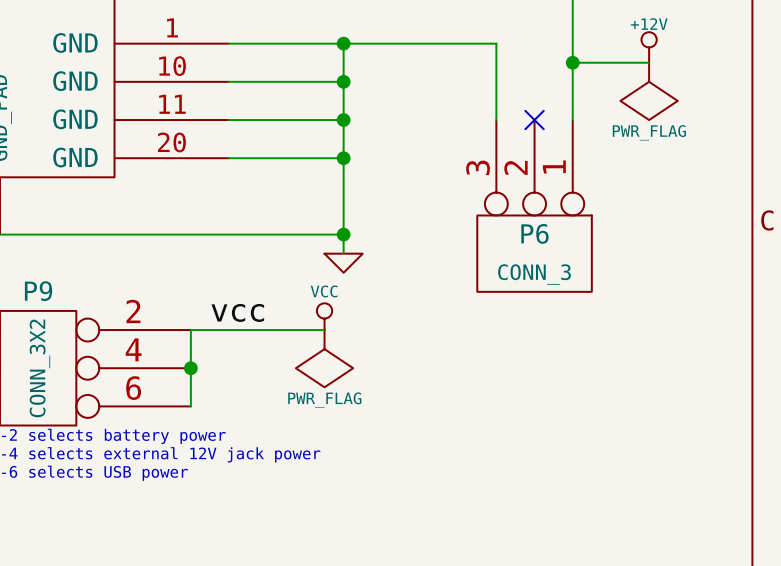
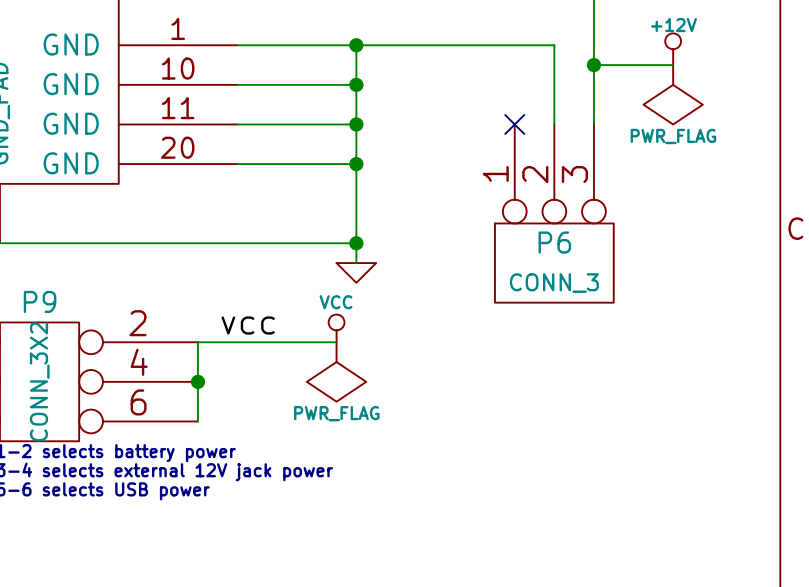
wire: (496, 43) (496, 120) -> (514, 45) (554, 45) (554, 124)
no-connect mark position: (534, 120) -> (514, 124)
P6 flip: as is (534, 253) -> left-right (554, 263)

